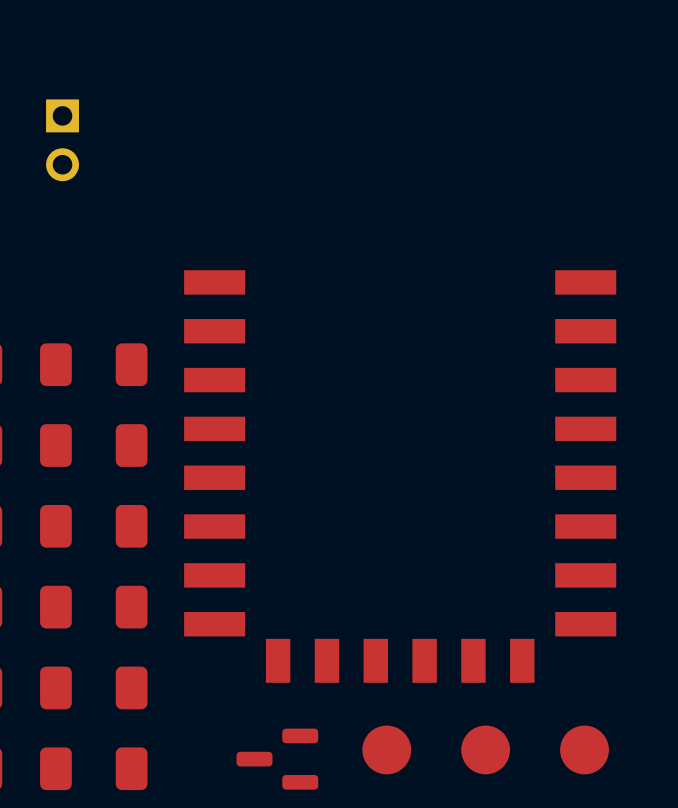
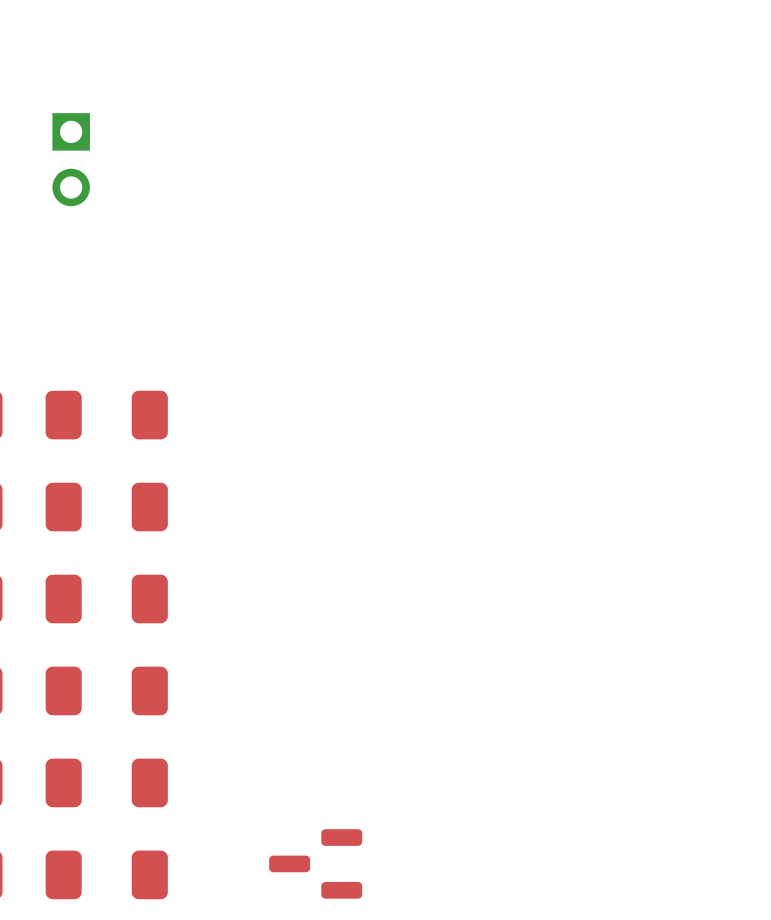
part: (400, 476) -> none
part: (386, 749) -> none
part: (485, 749) -> none
part: (584, 749) -> none

